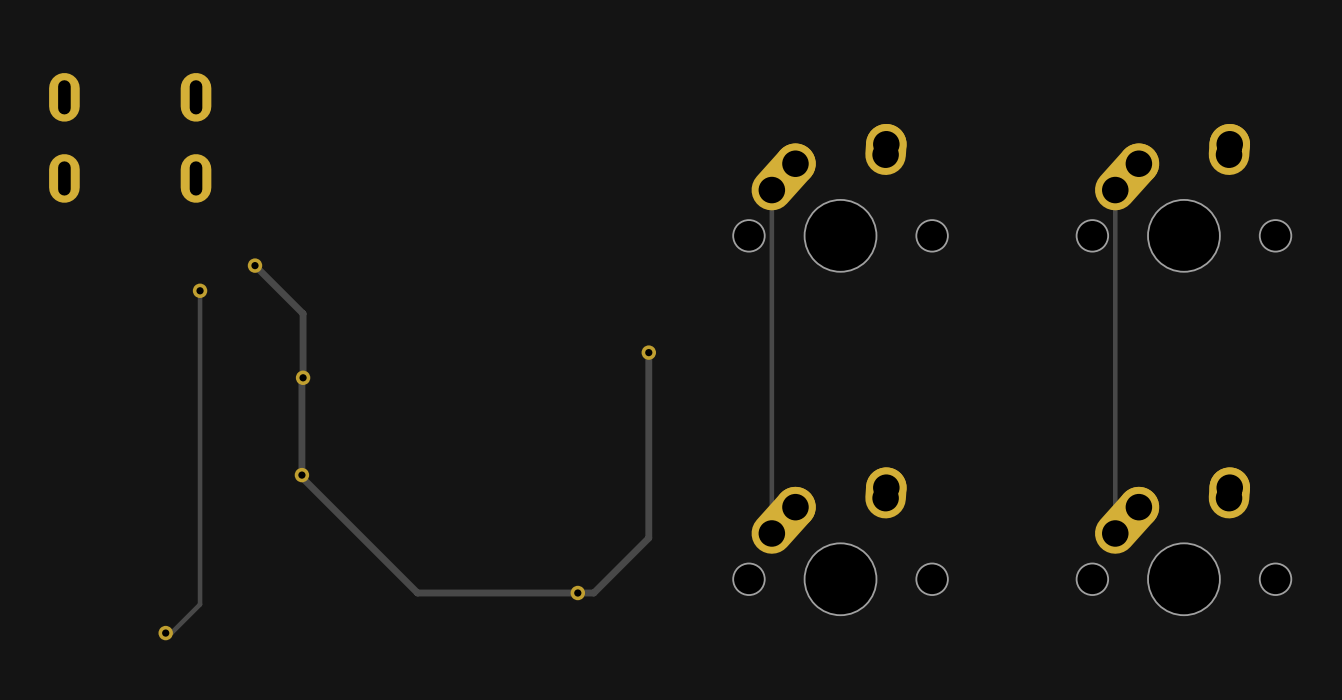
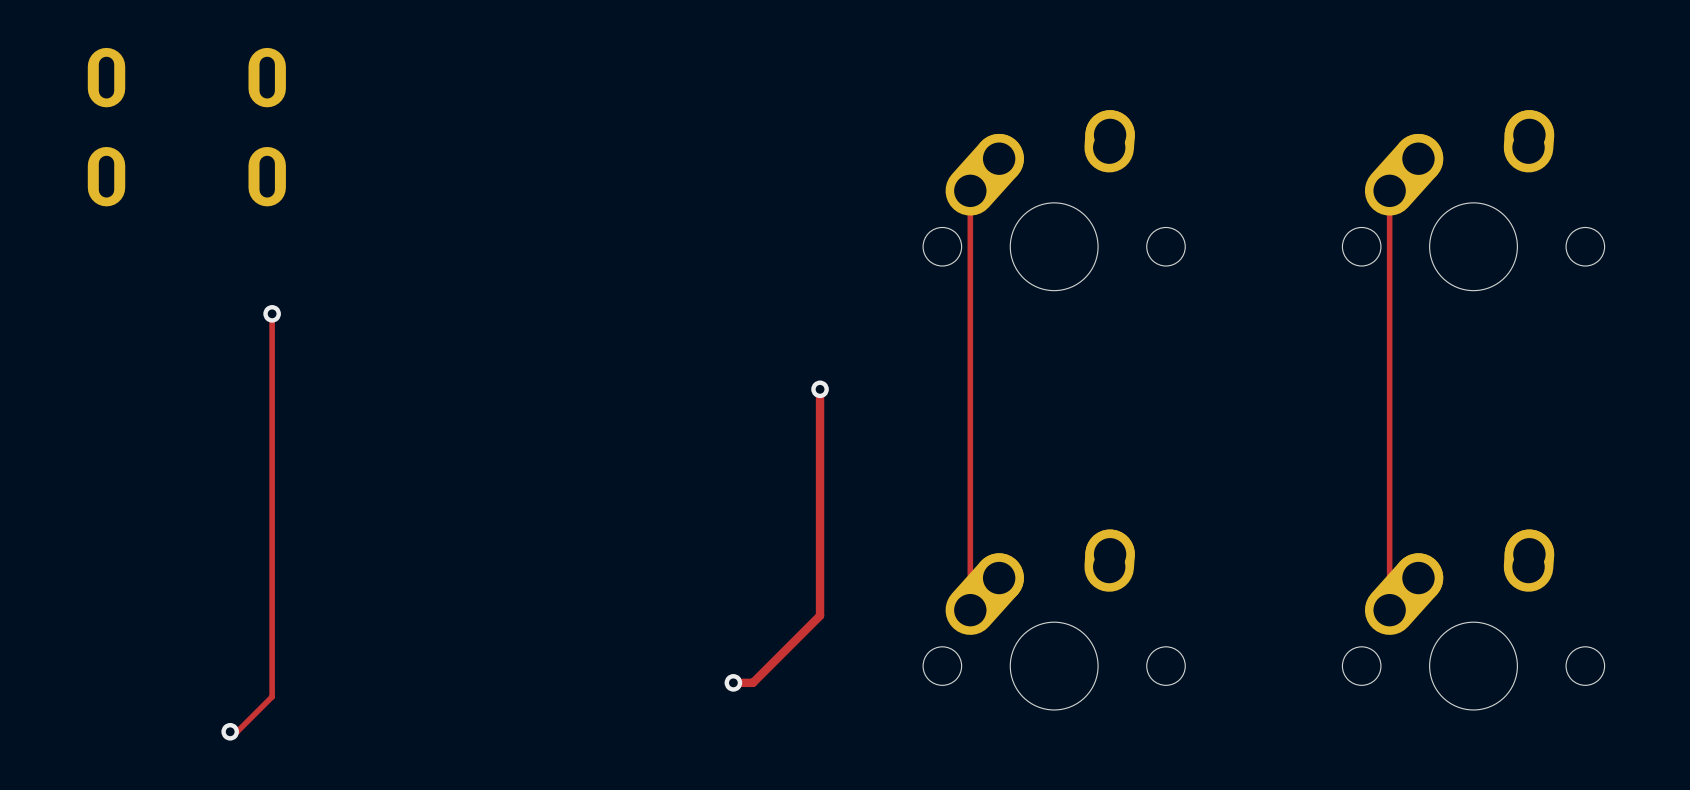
track: (254, 265) (303, 313) (301, 477) (417, 593) (577, 593) -> none
via: (254, 265) -> none
via: (303, 377) -> none
via: (301, 475) -> none

